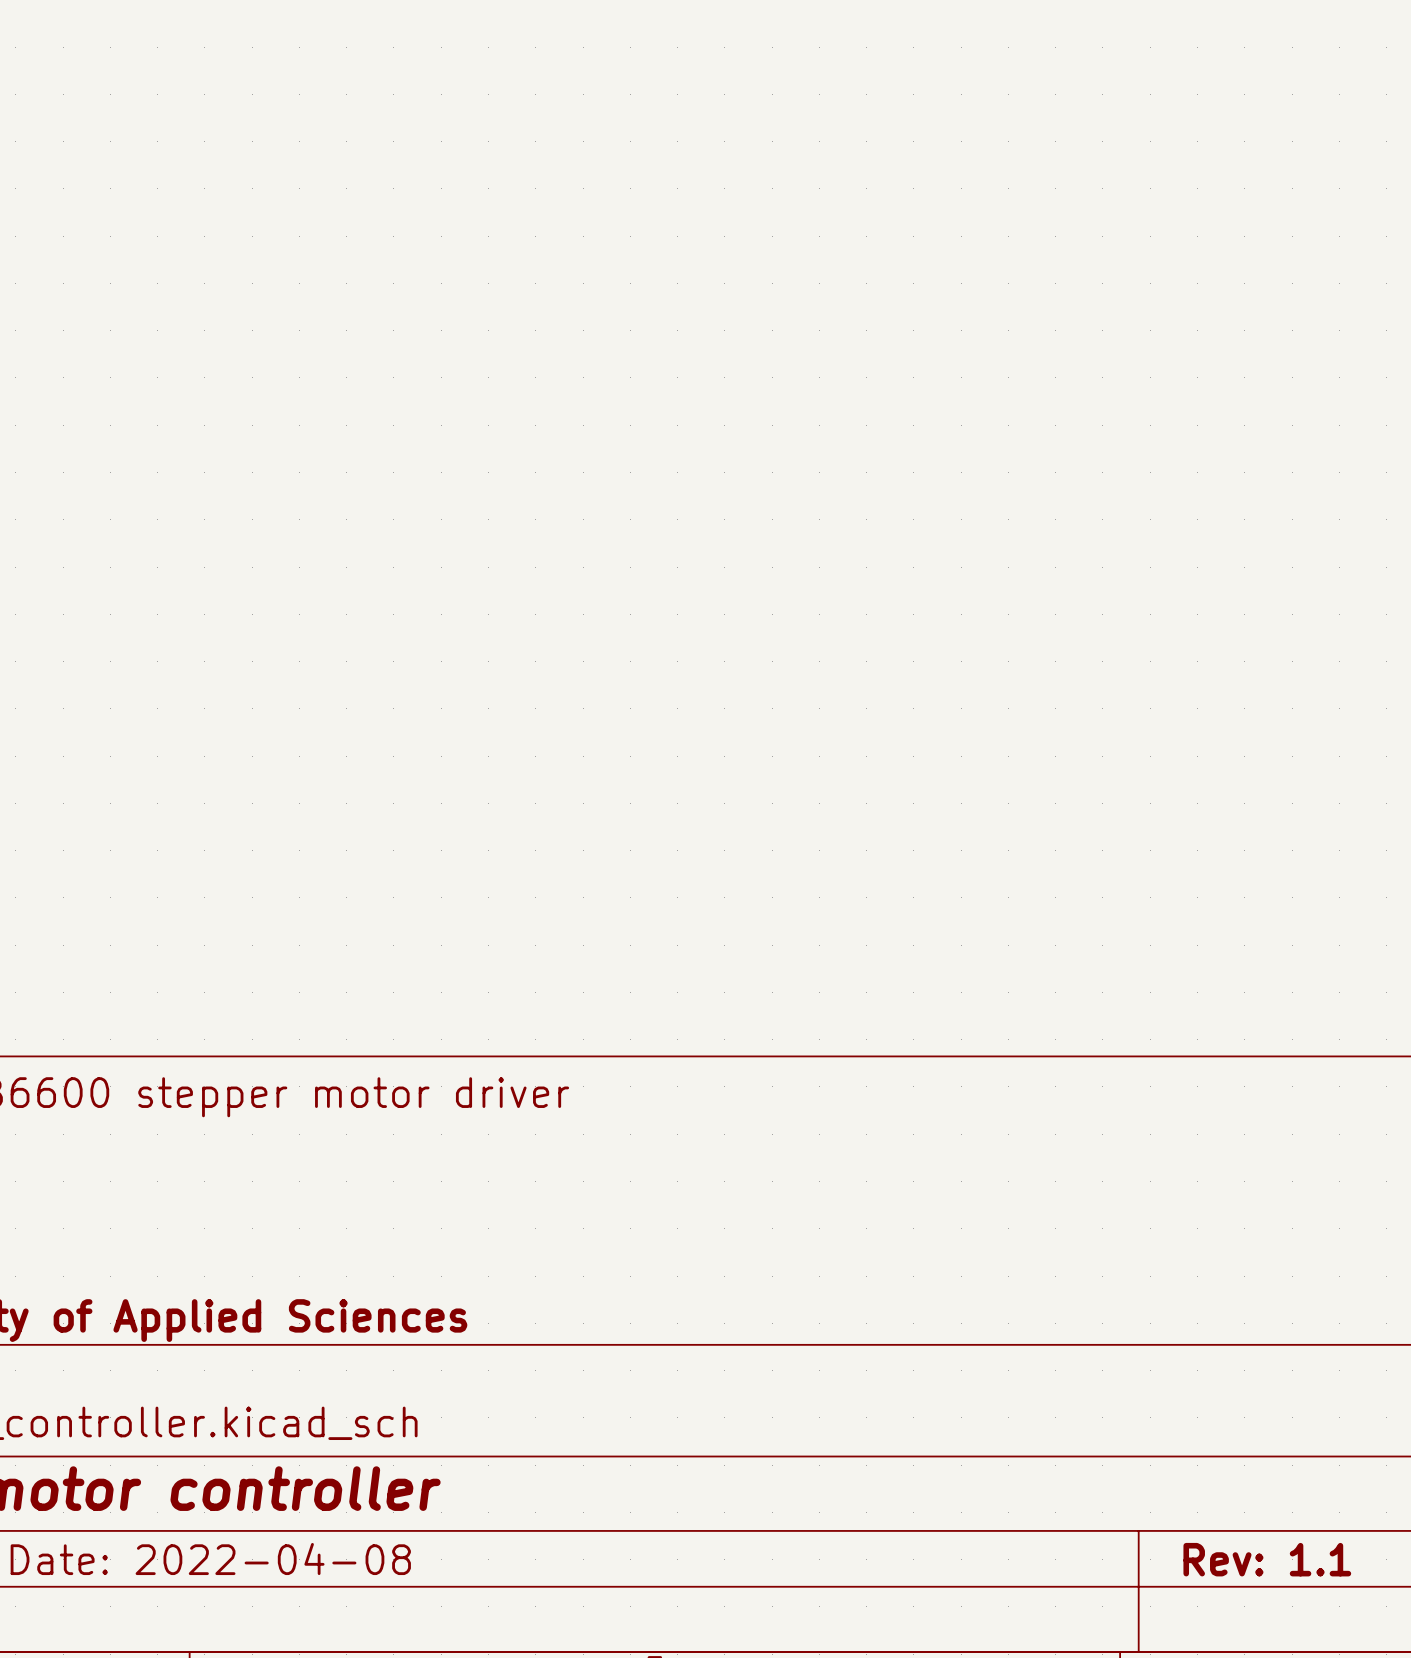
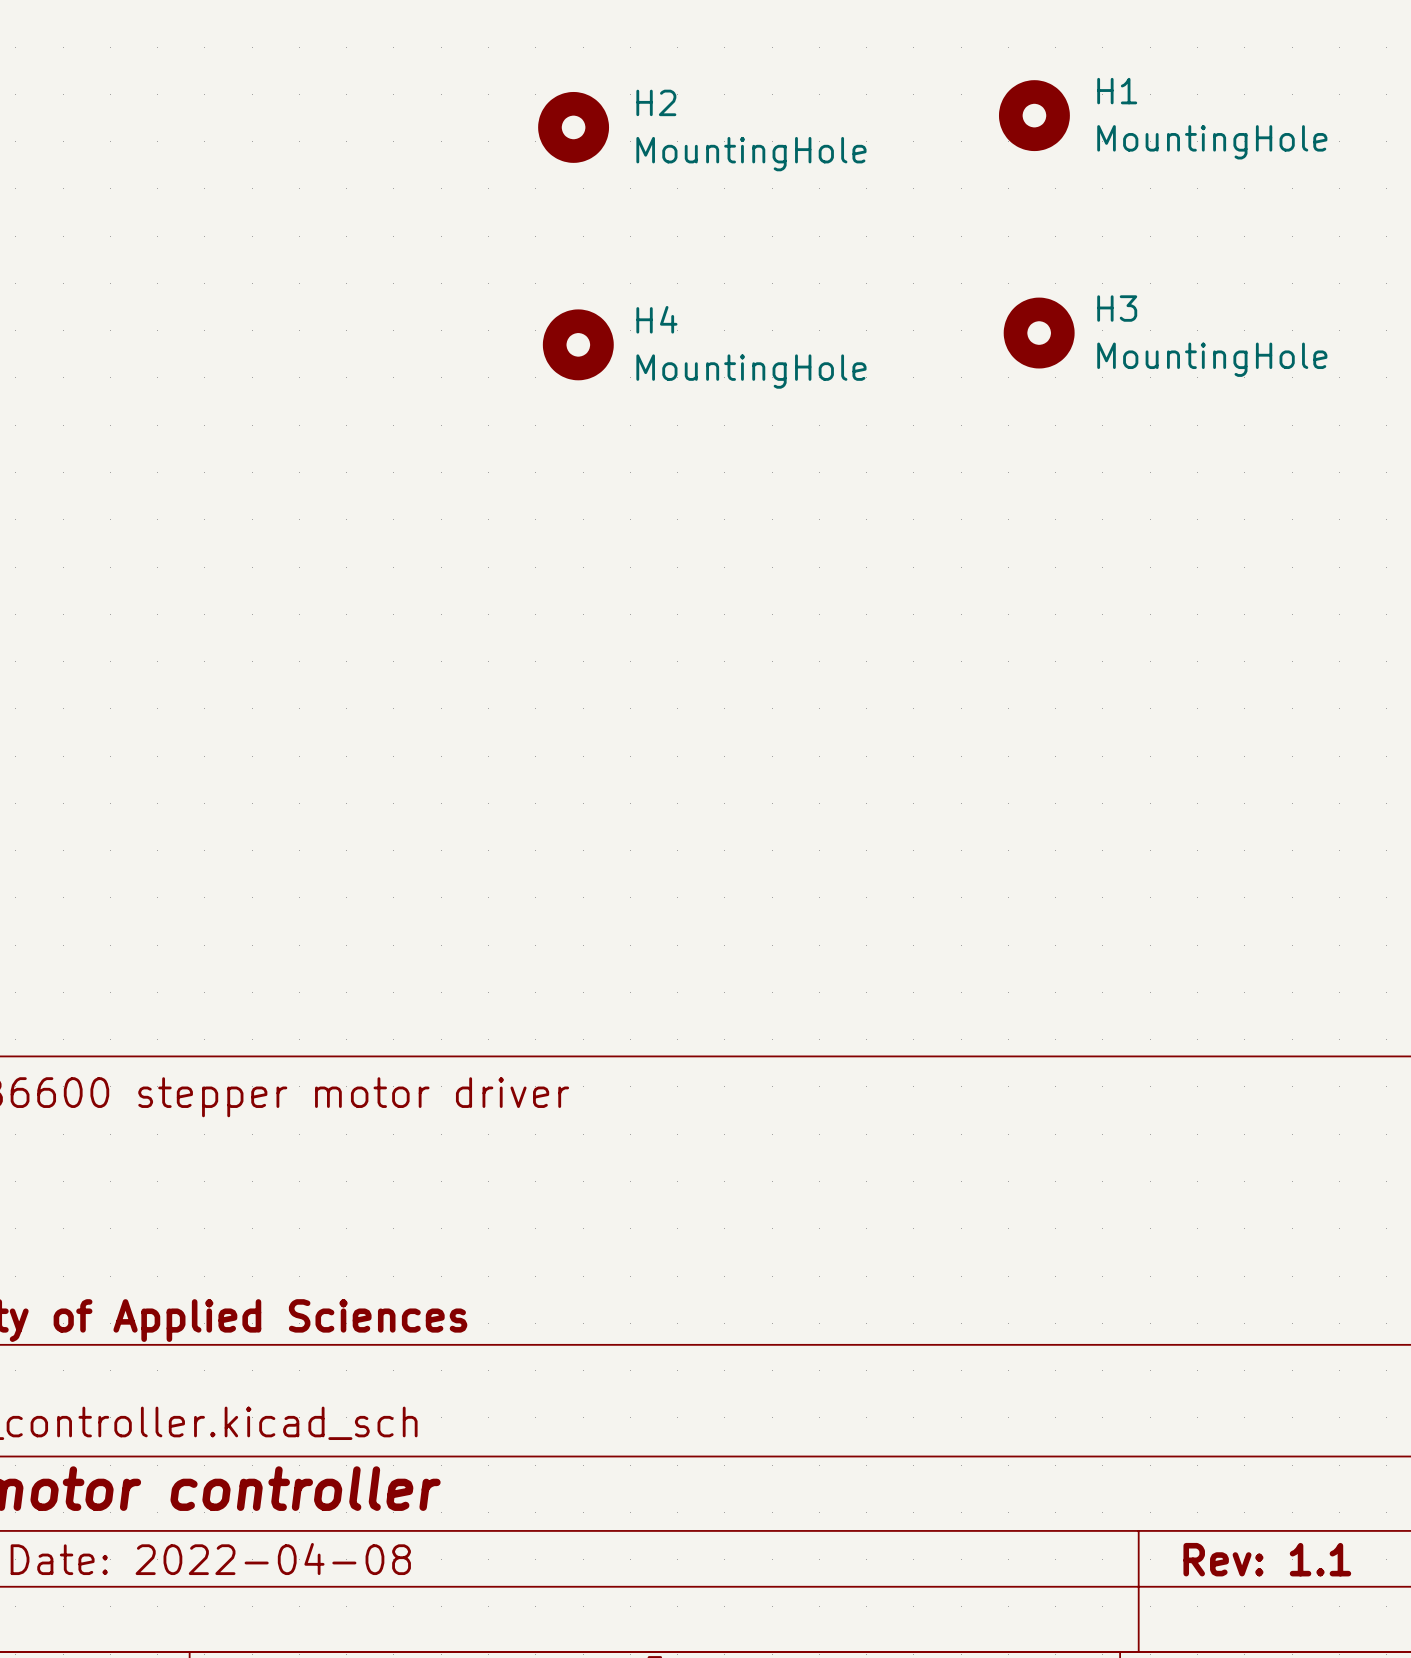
H1: none -> MountingHole (1034, 115)
H2: none -> MountingHole (573, 127)
H3: none -> MountingHole (1039, 333)
H4: none -> MountingHole (578, 344)

